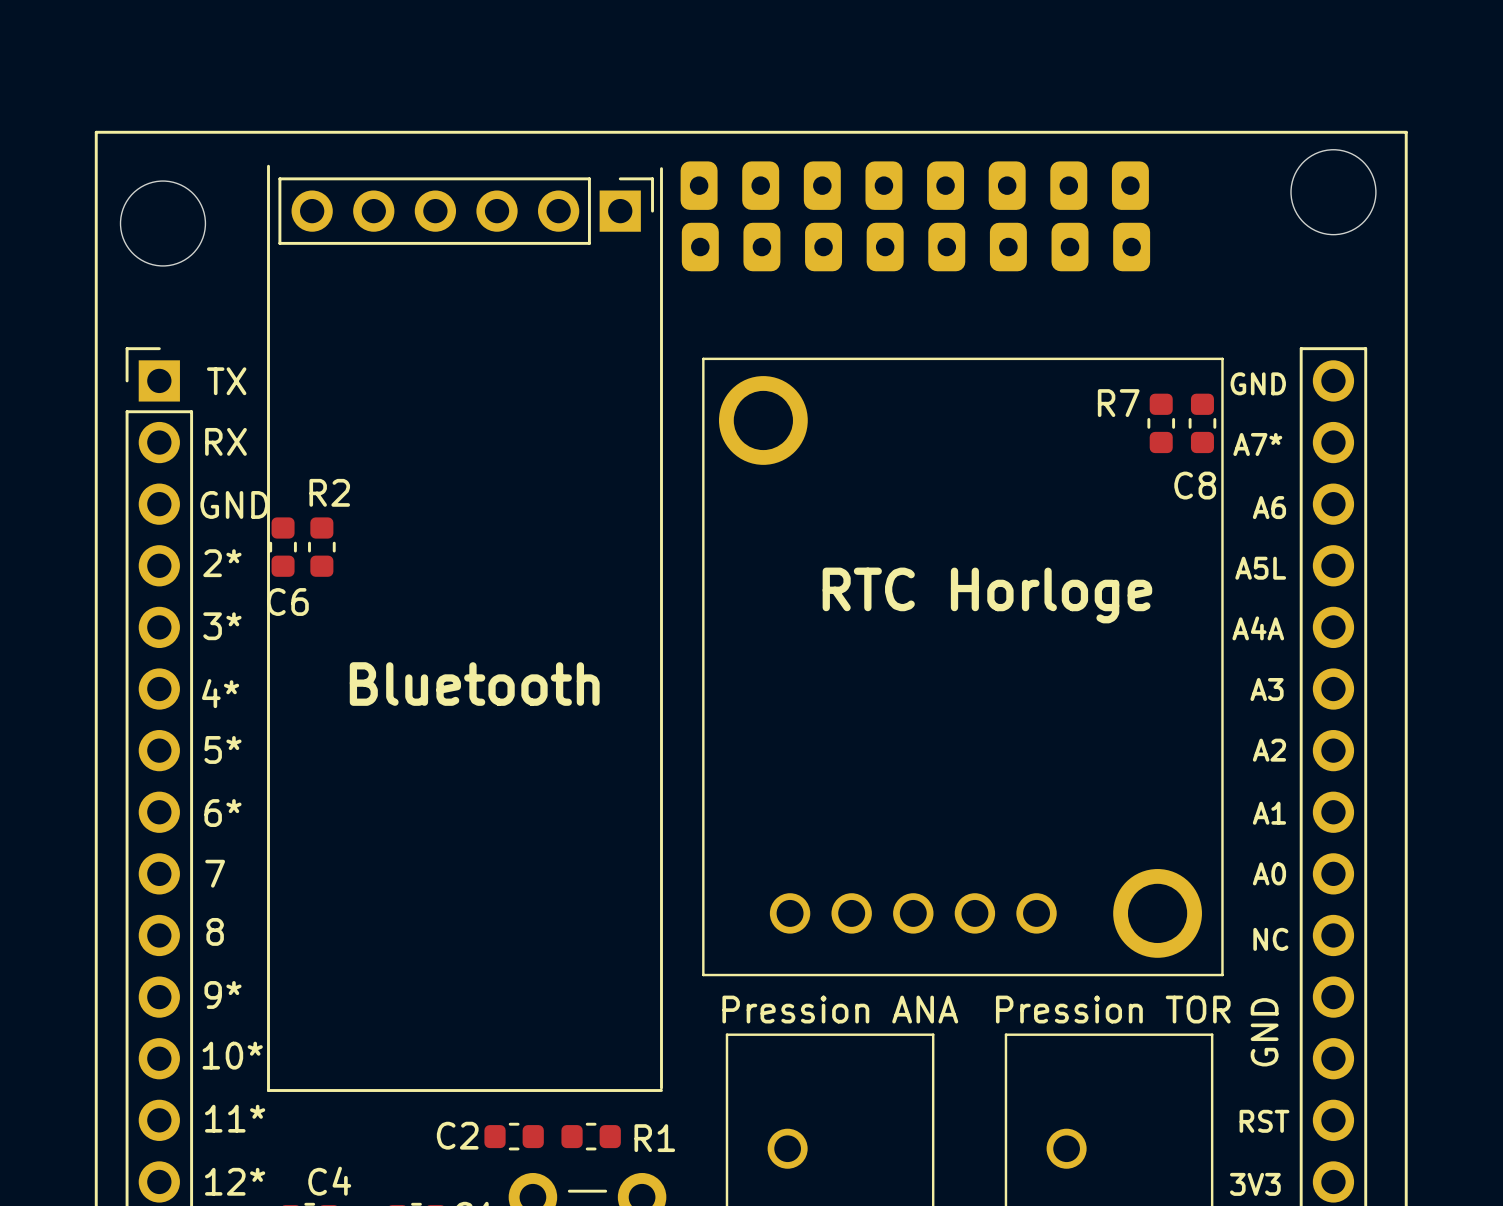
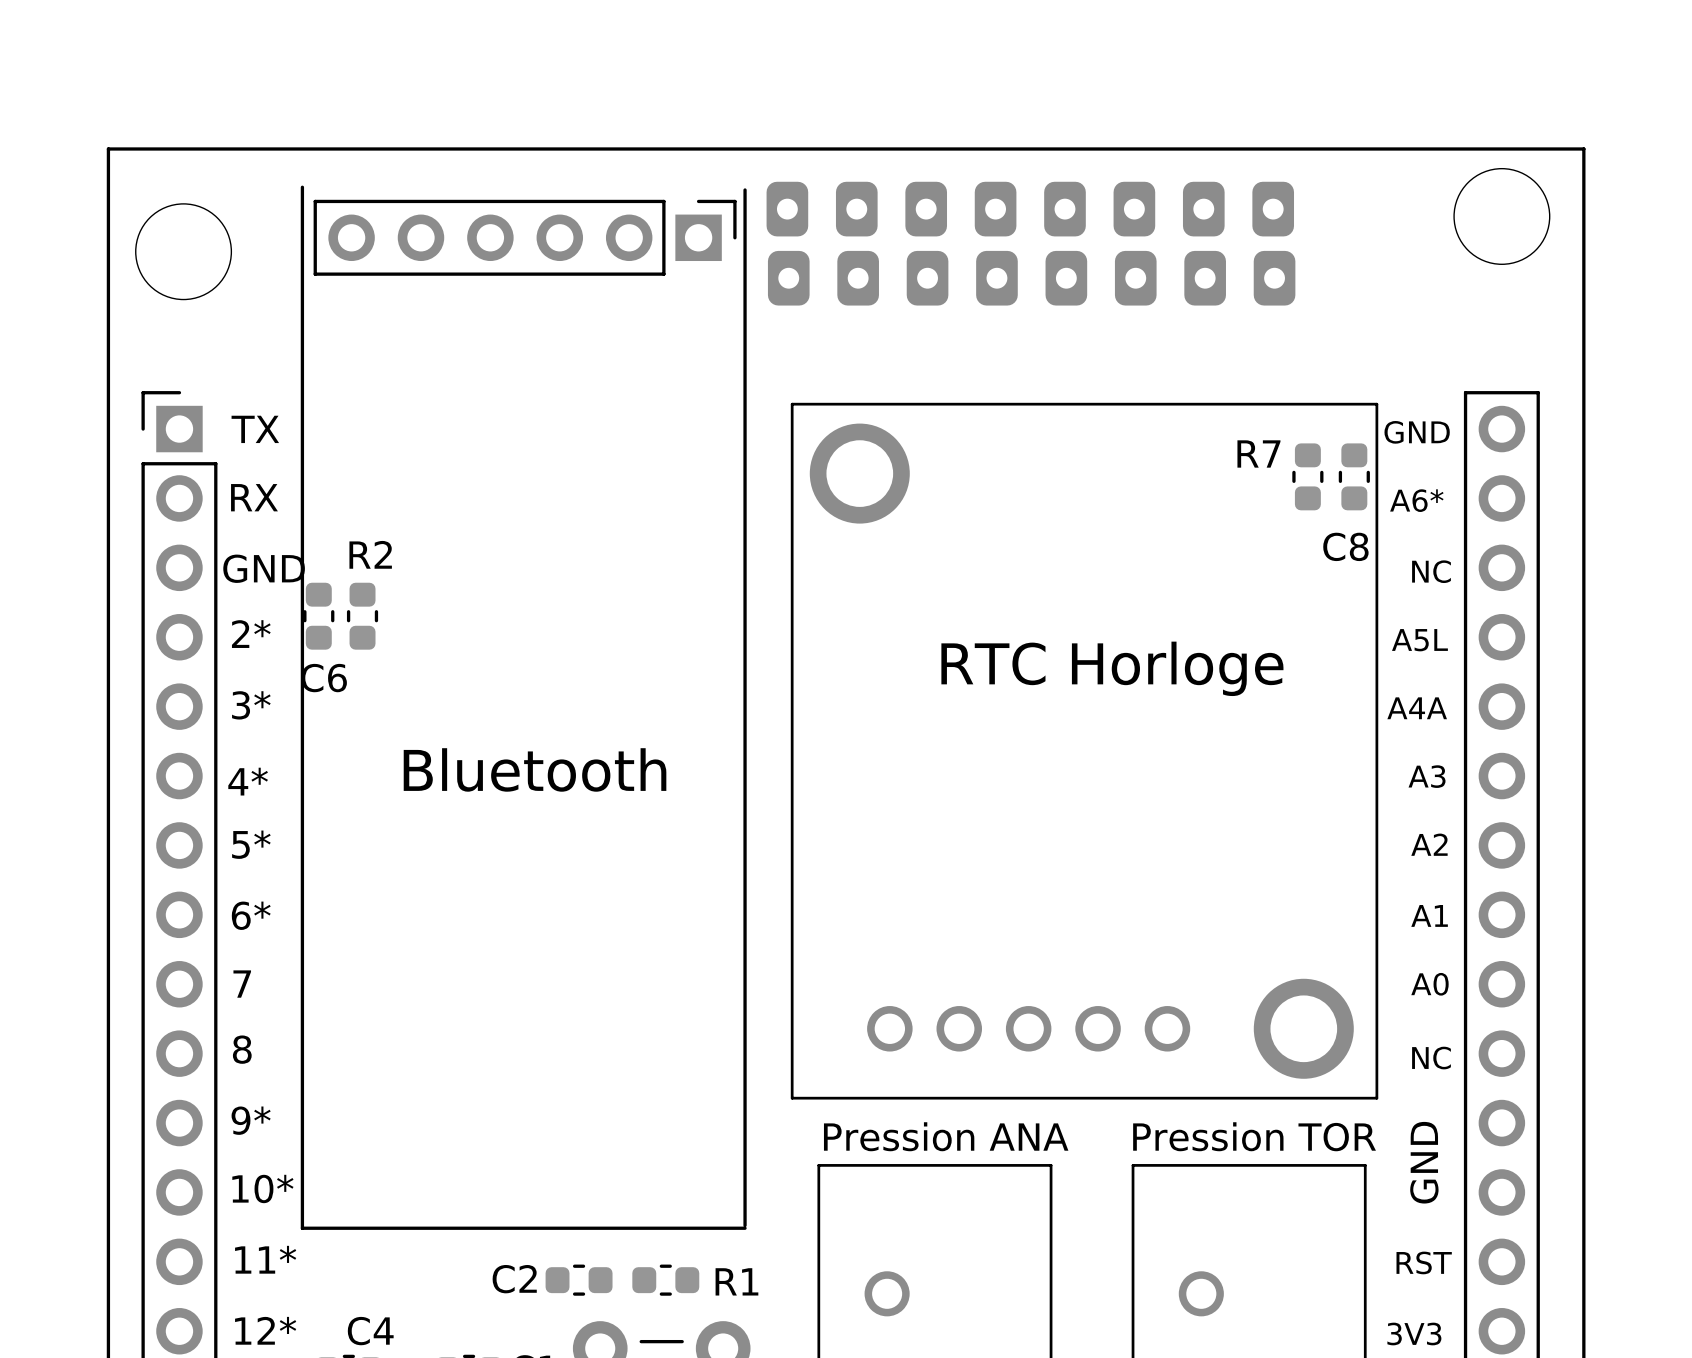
text: A7* (1257, 444) -> A6* (1416, 500)
text: A6 (1269, 507) -> NC (1431, 571)

